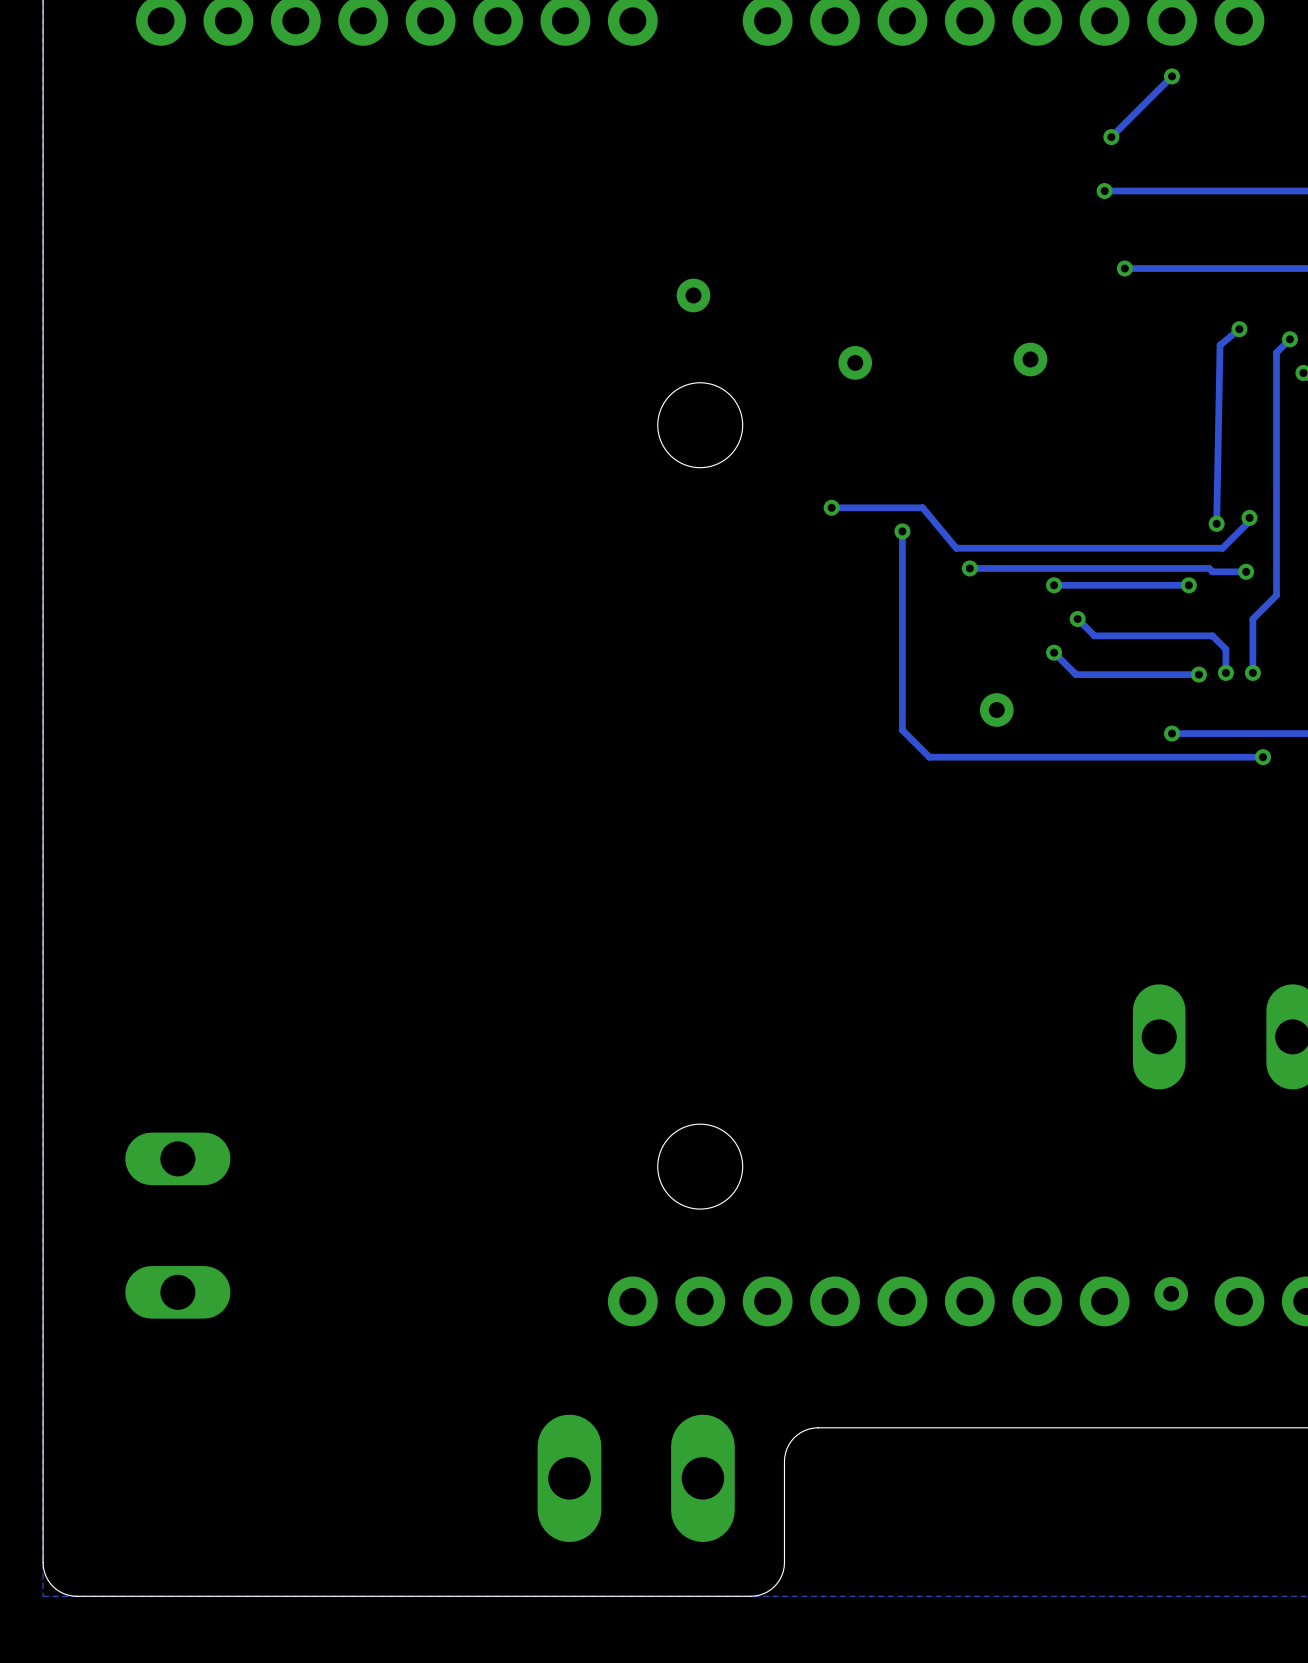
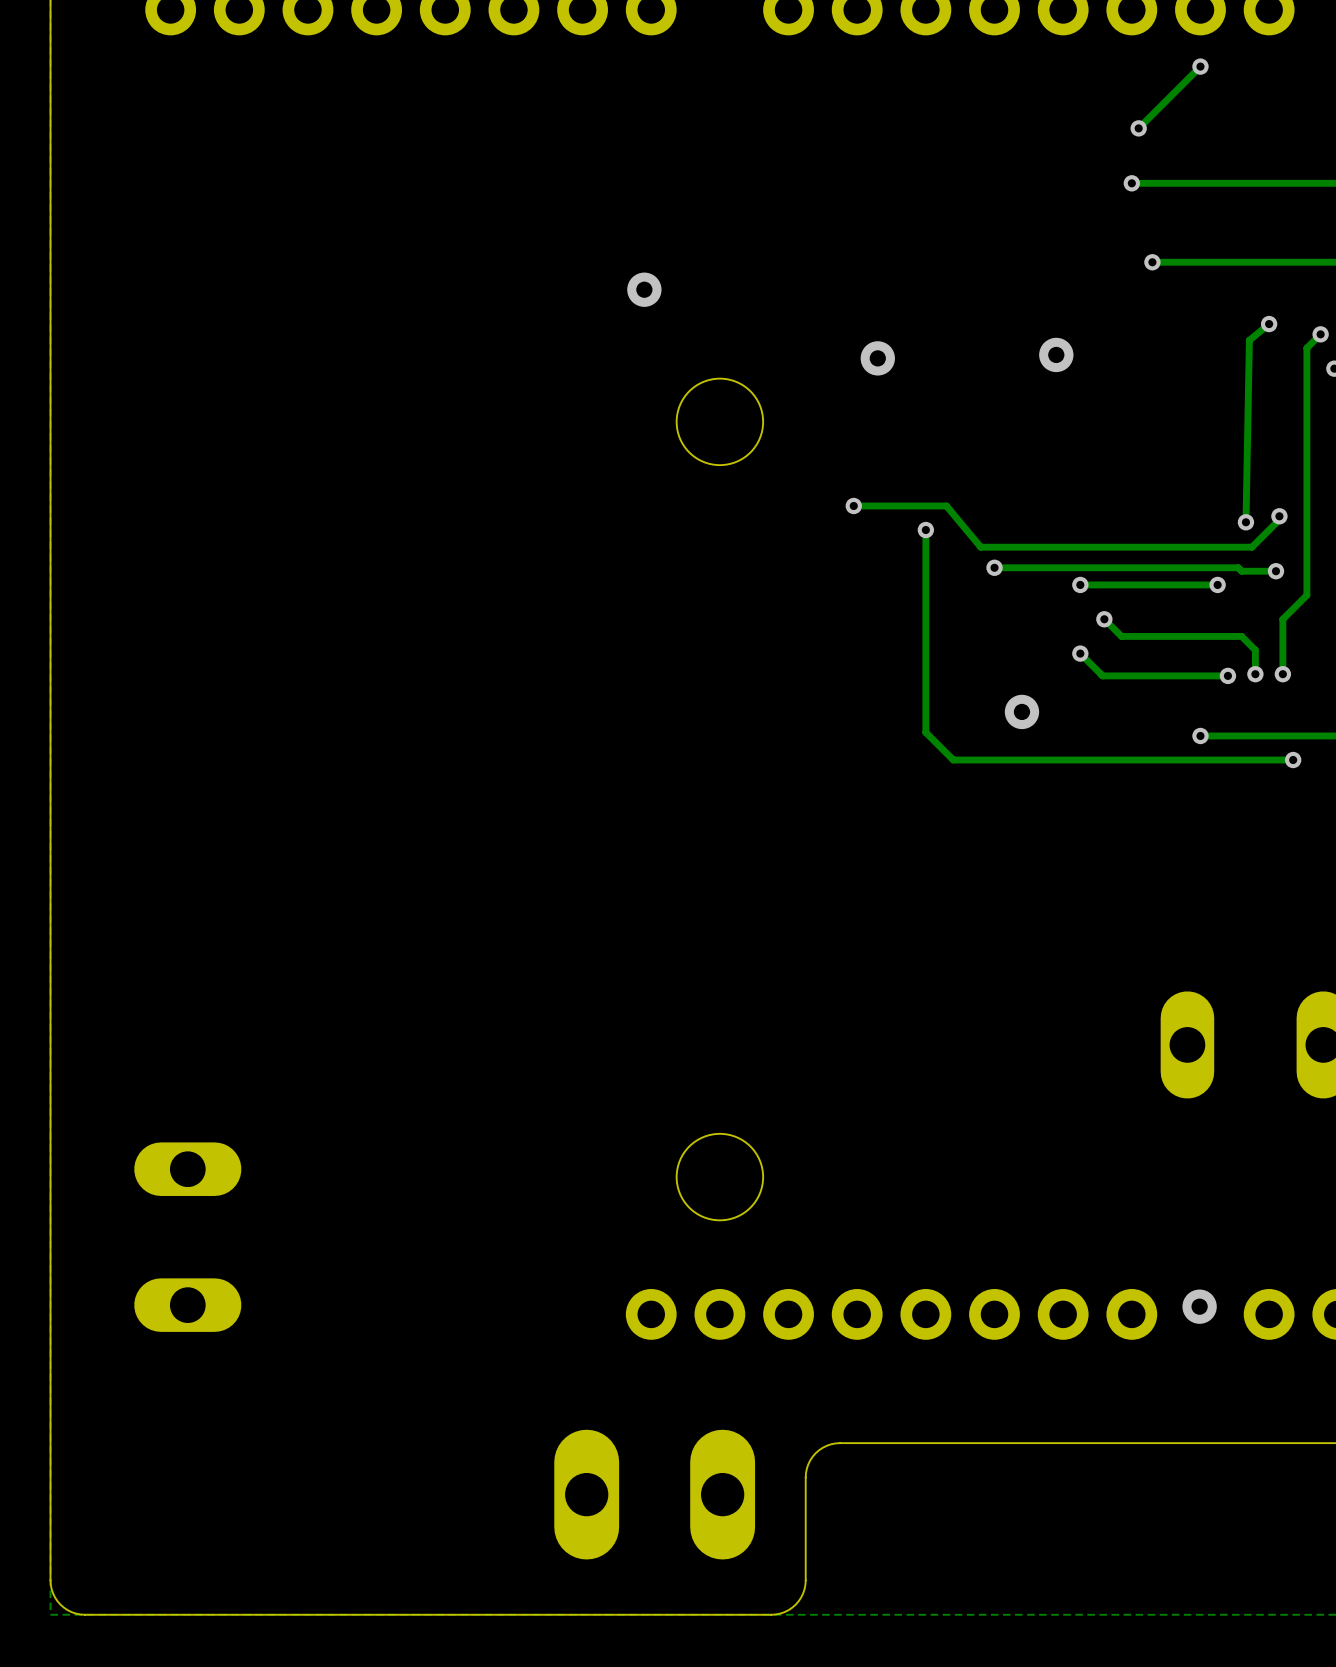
via position: (693, 295) -> (644, 289)

